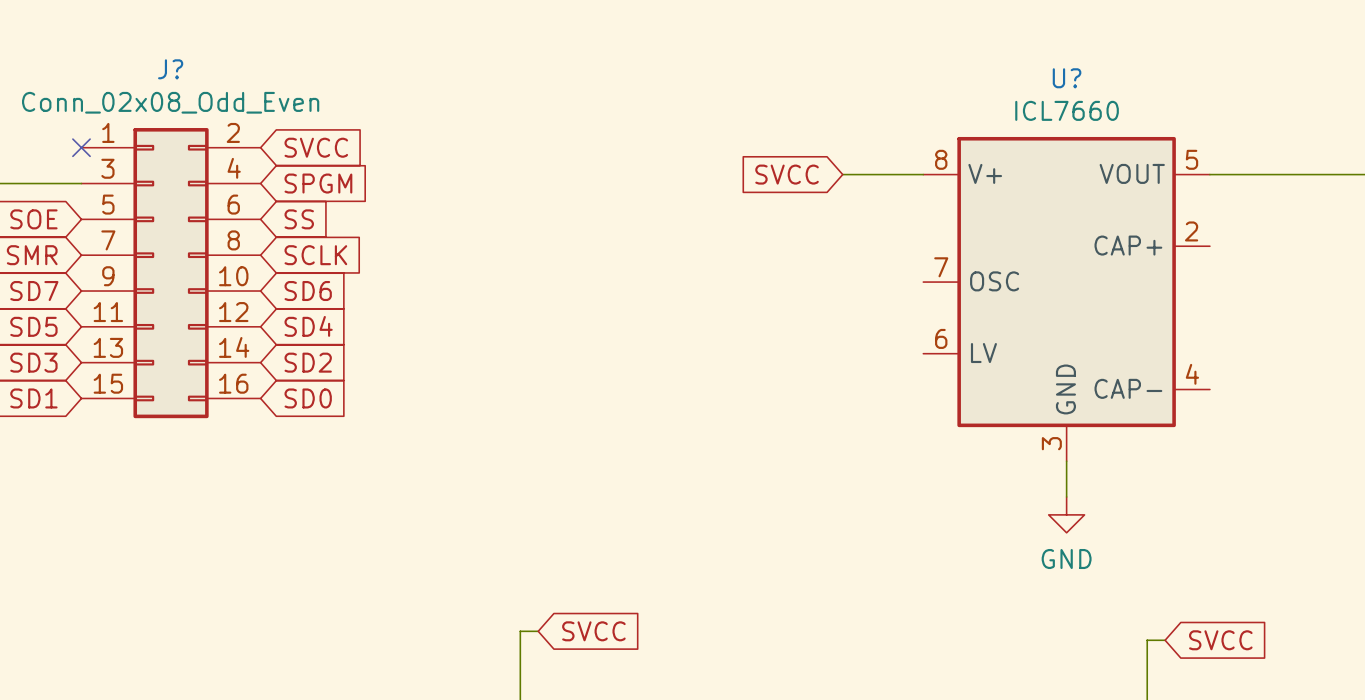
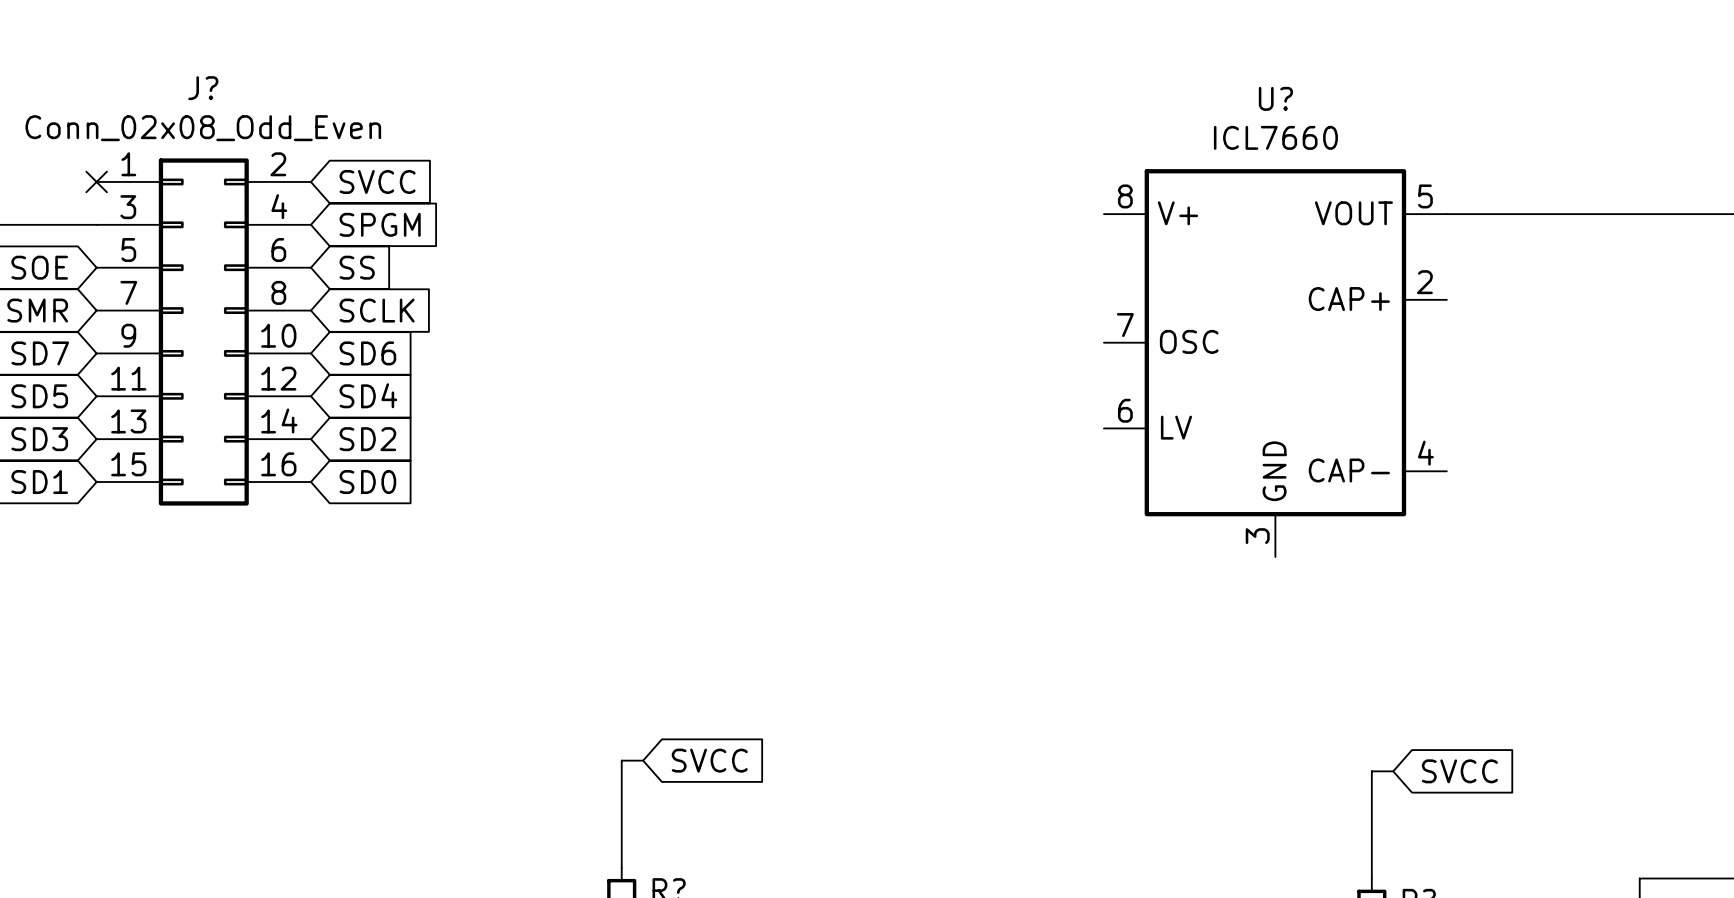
global label: SVCC (787, 174) -> none
wire: (842, 174) (923, 174) -> none
wire: (1066, 461) (1066, 496) -> none
power symbol: GND (1066, 514) -> none

